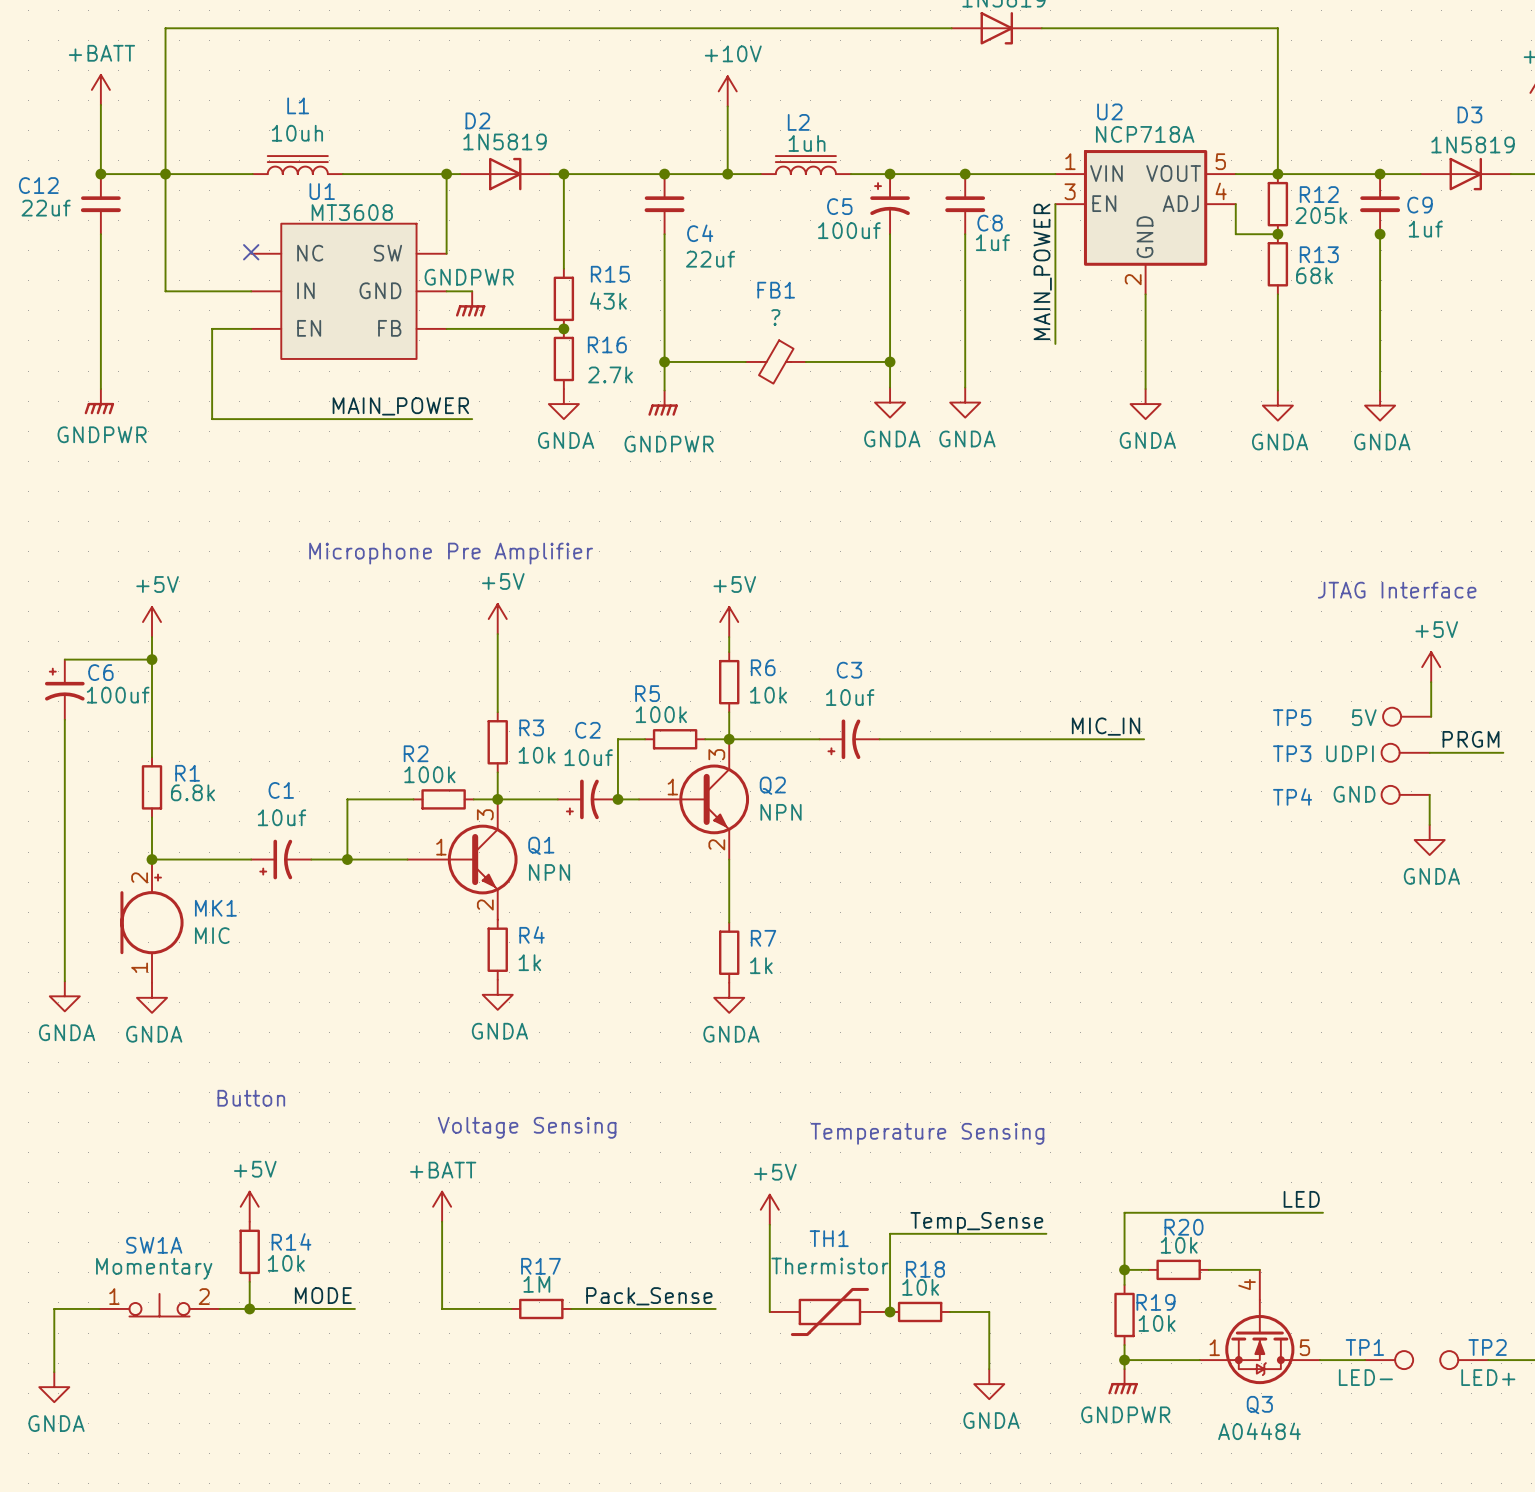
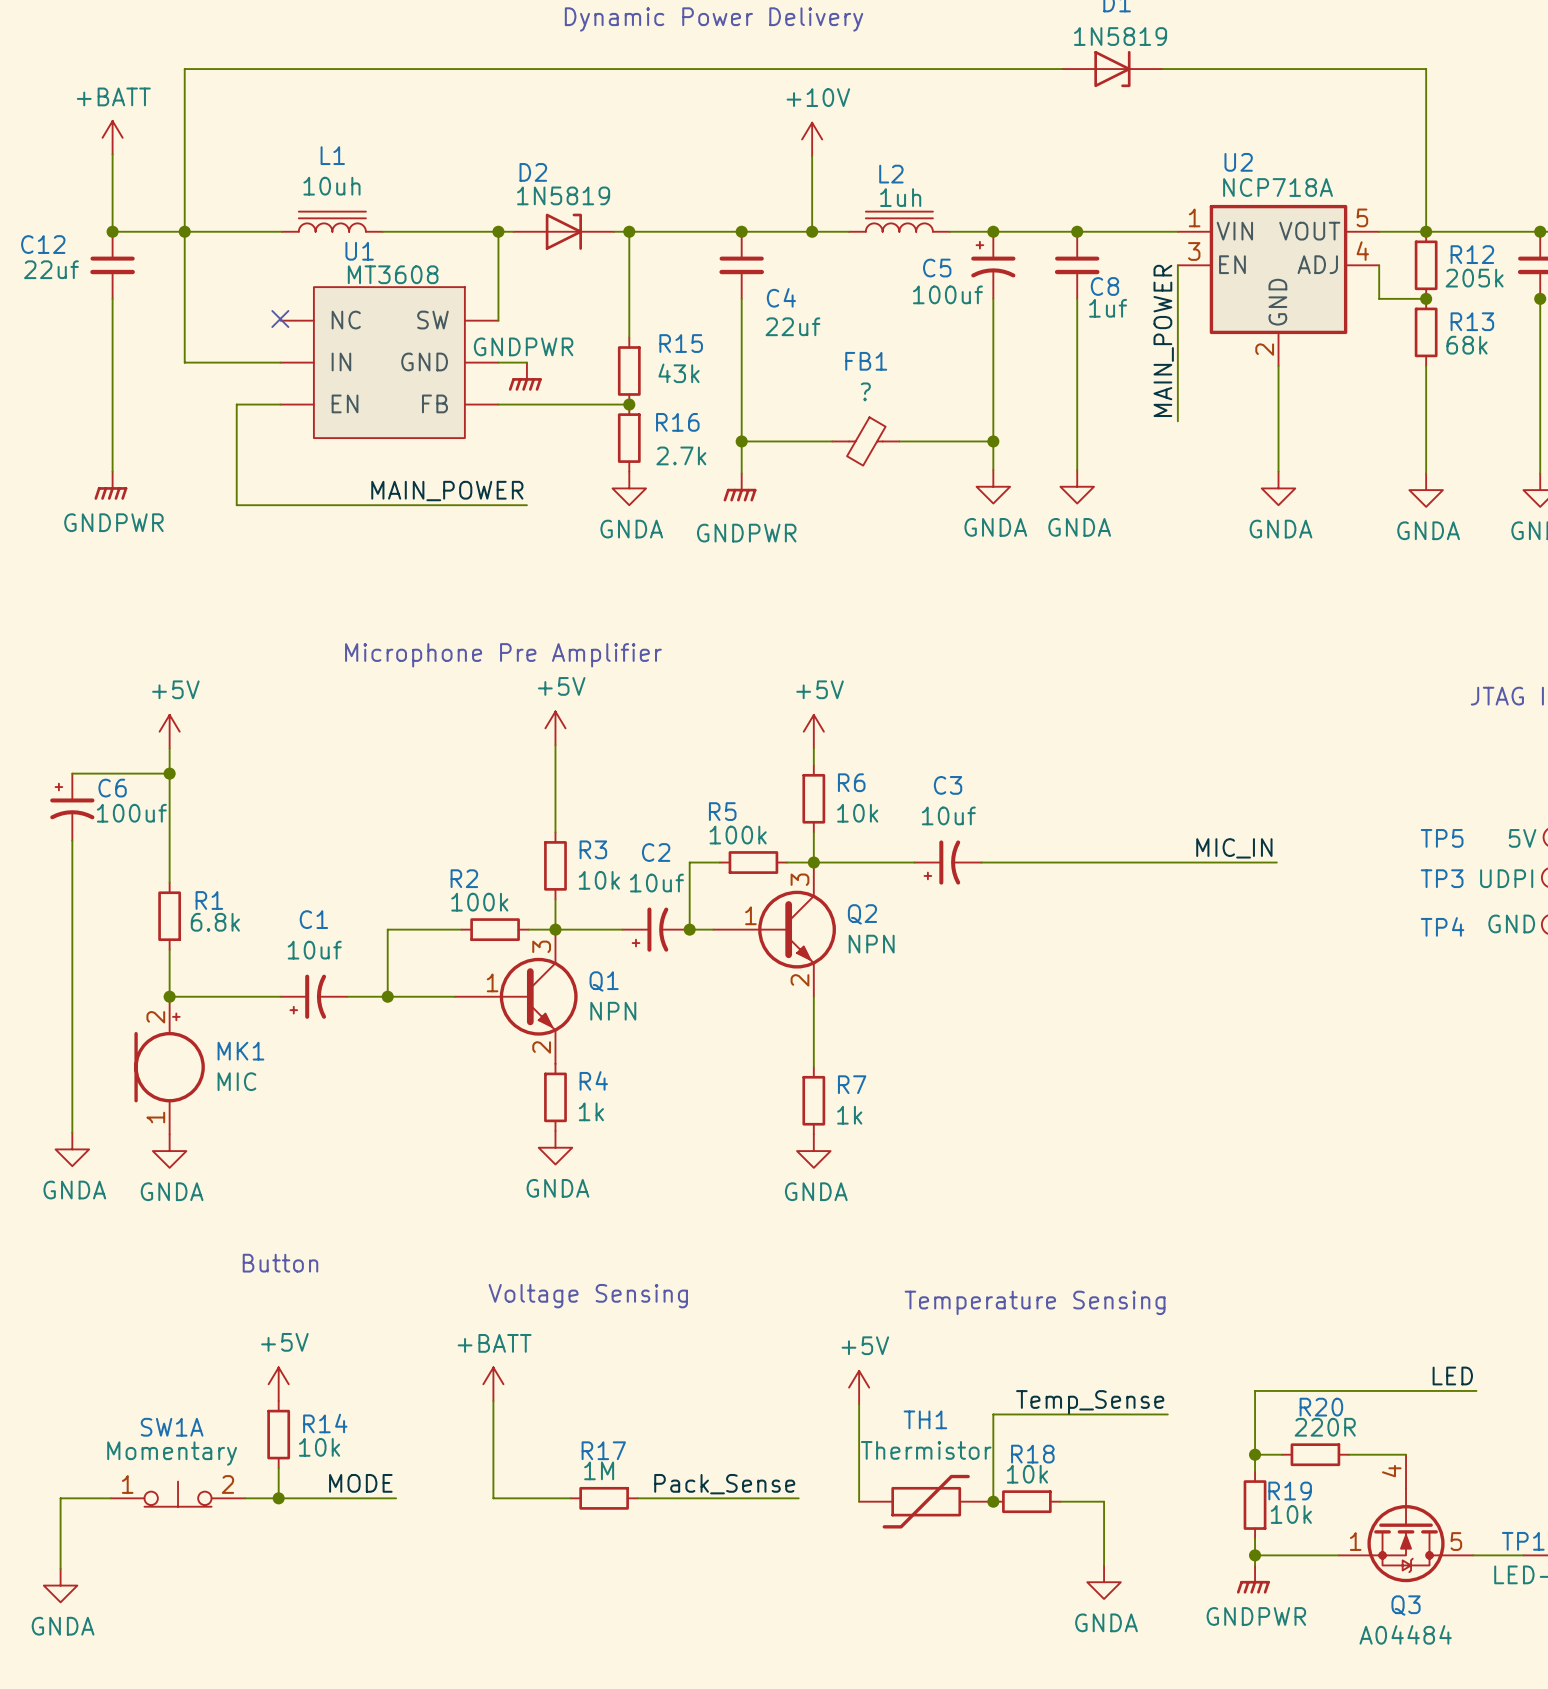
R20 value: 10k (1179, 1245) -> 220R (1325, 1427)

